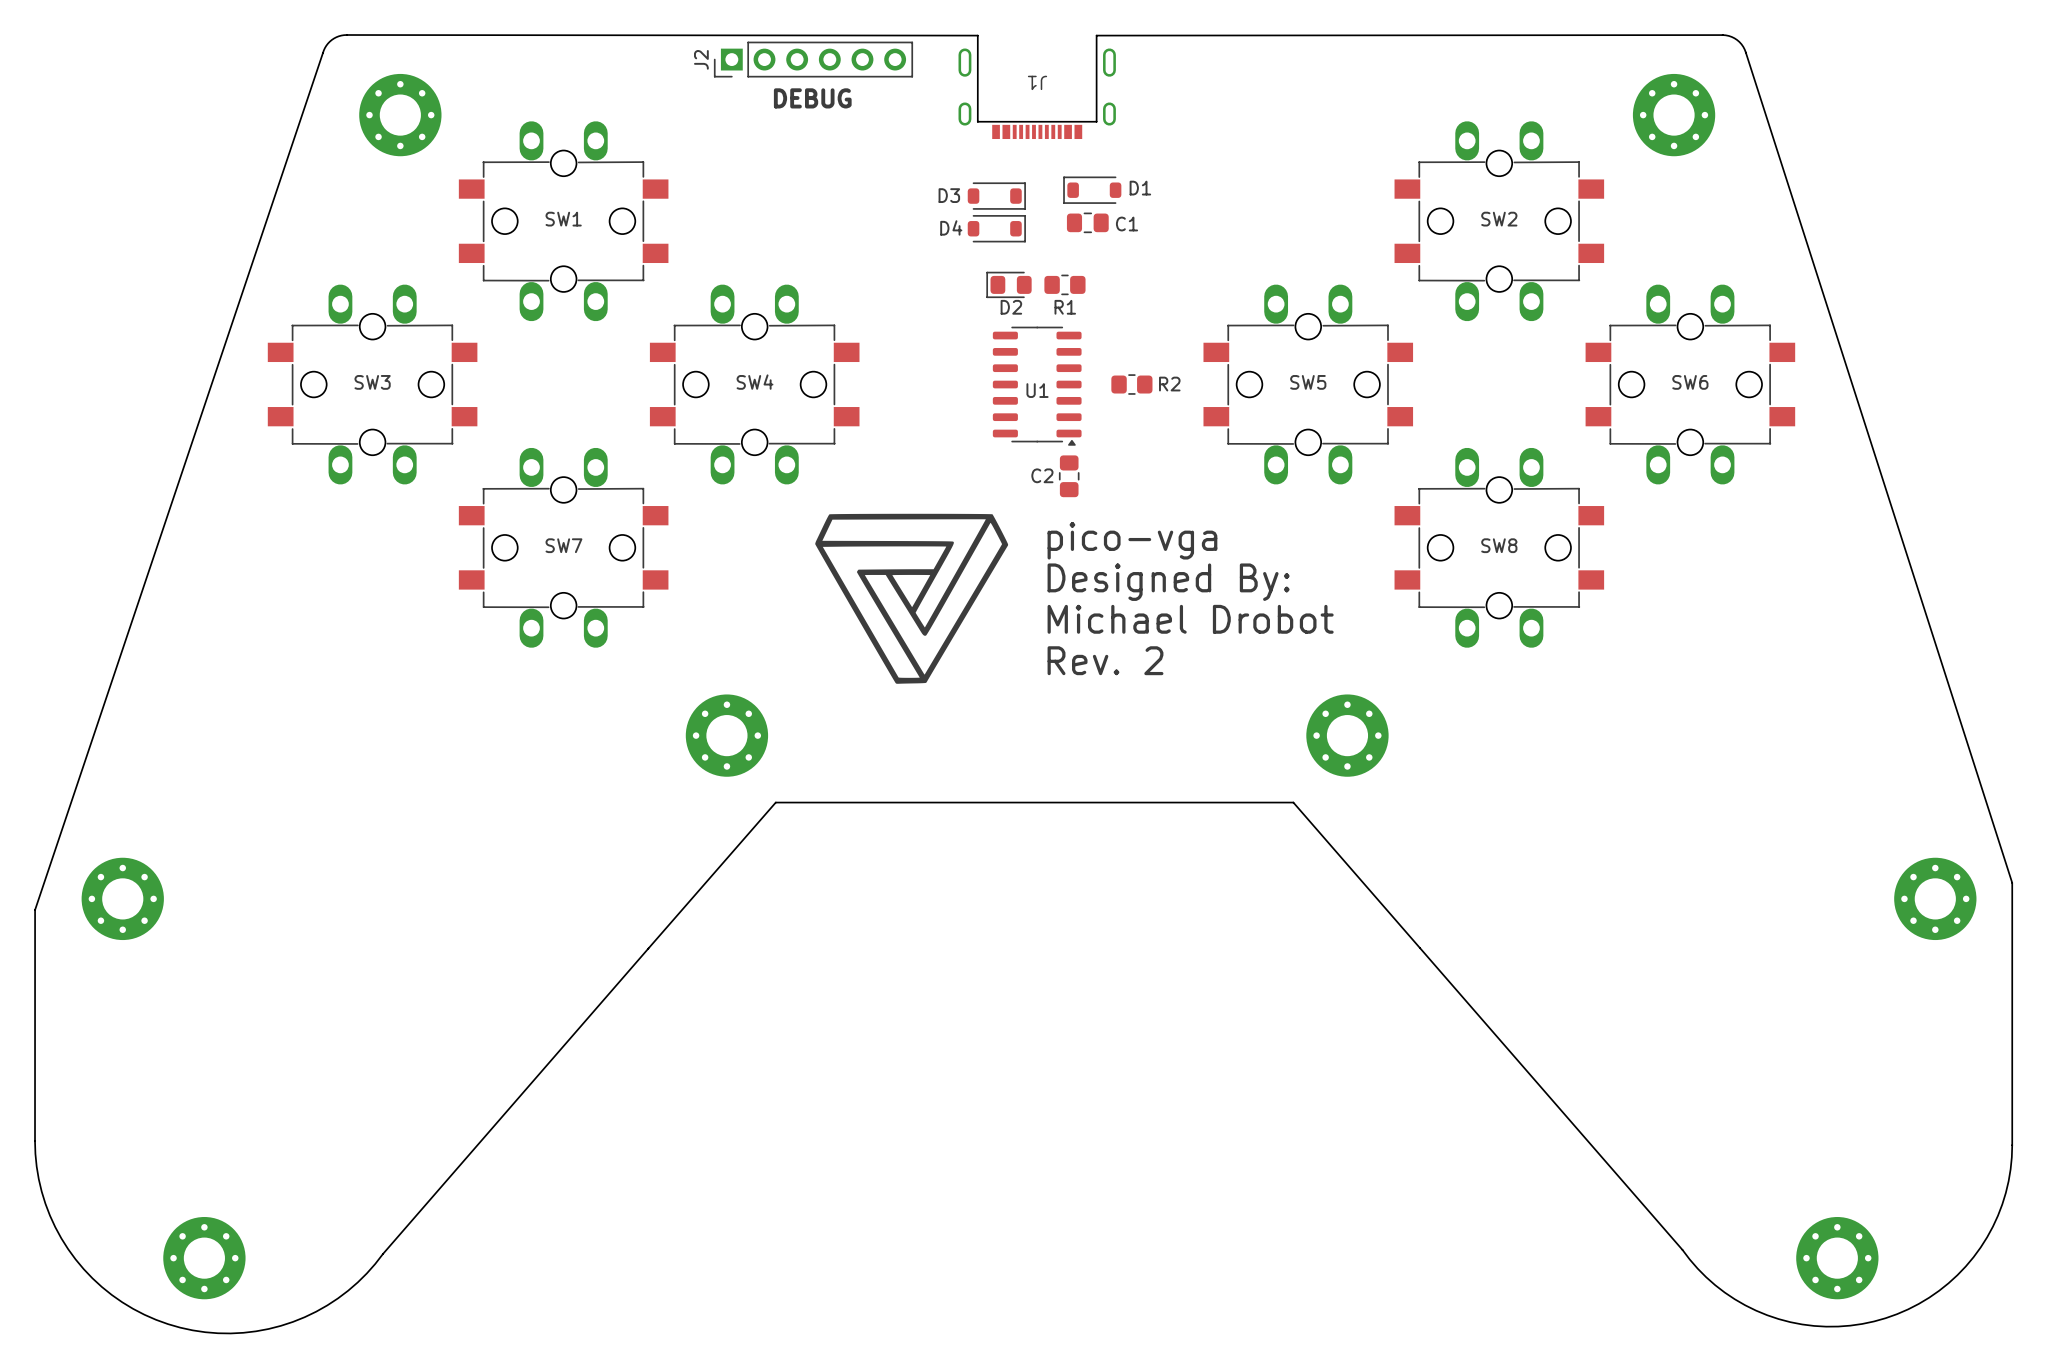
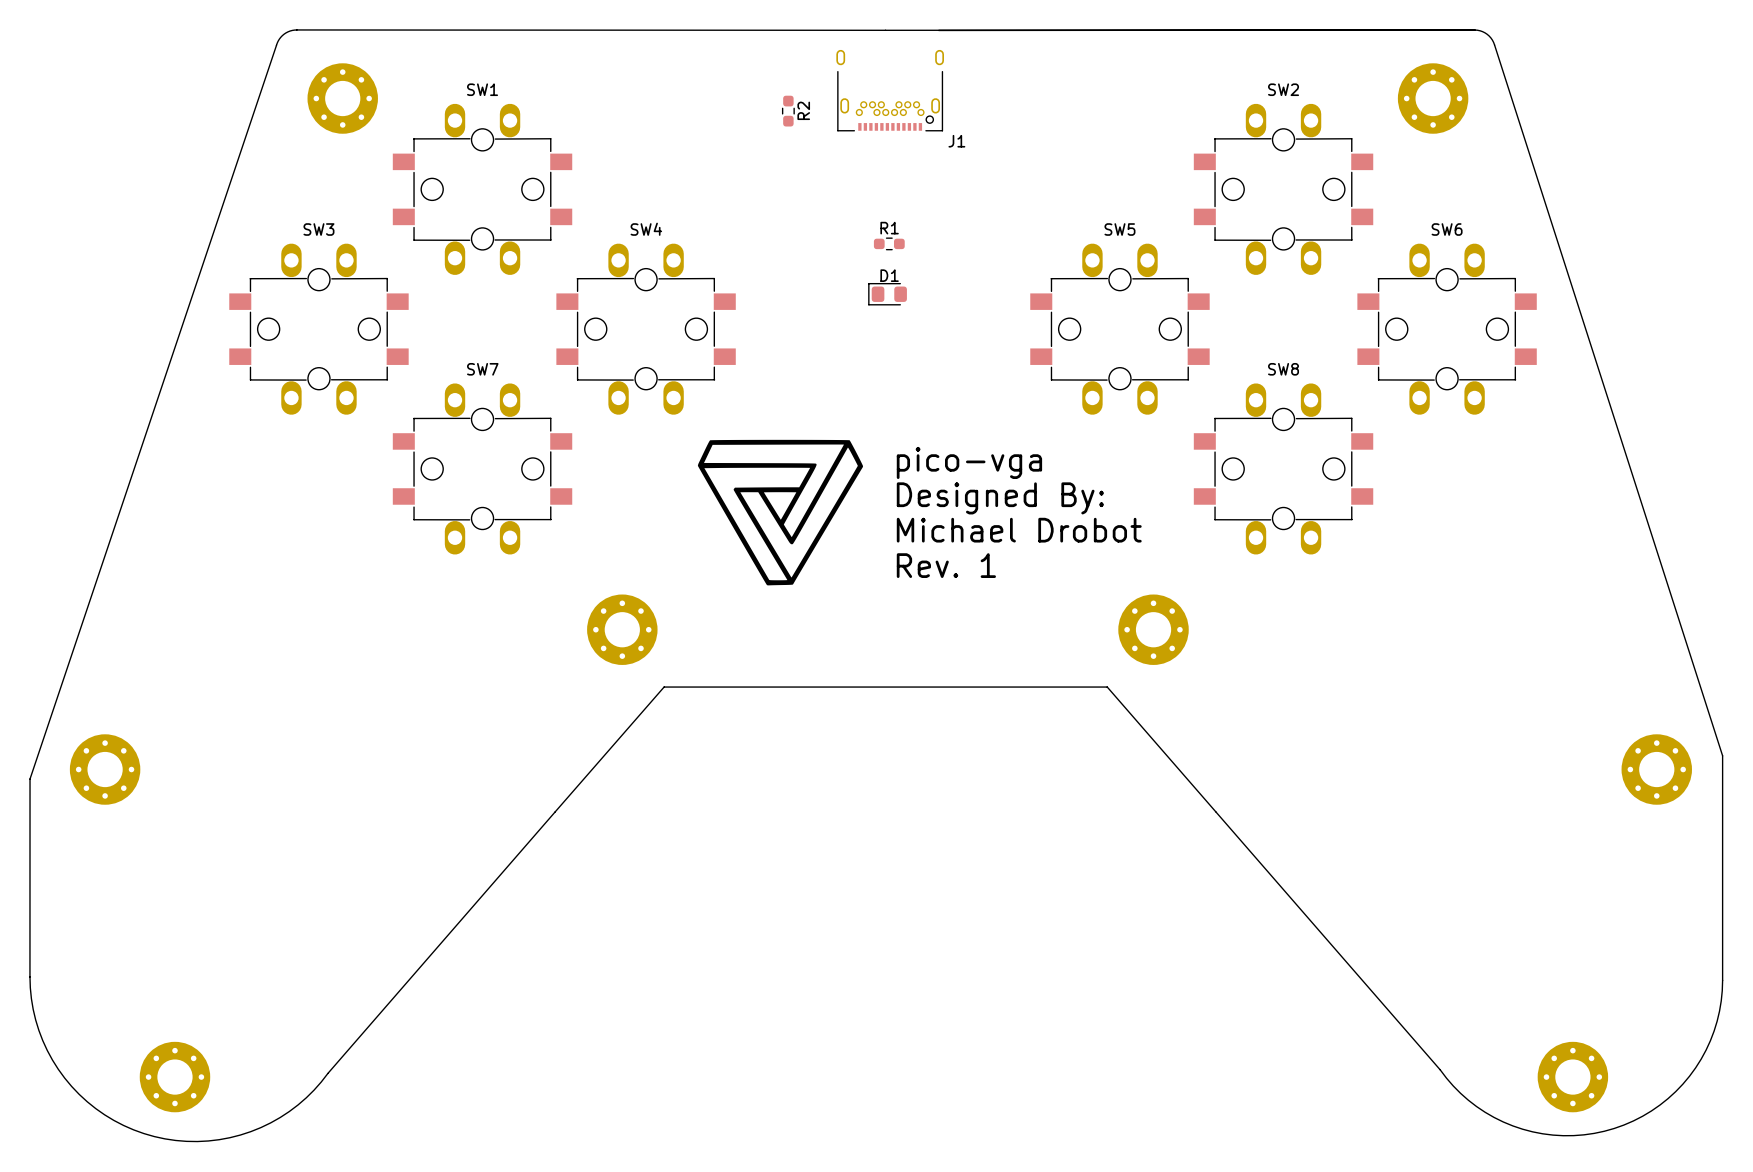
J1 footprint: [958, 34, 1116, 140] -> [836, 49, 944, 132]
board edge: (346, 35) (977, 35) -> (296, 29) (1474, 30)
J2: (813, 59) -> none
J1 name position: J1 (1037, 82) -> J1 (956, 141)
text: DEBUG (812, 98) -> none
D1 footprint: [1063, 176, 1122, 204] -> [868, 283, 907, 306]
D1 name position: D1 (1140, 188) -> D1 (889, 275)
D3: (996, 196) -> none
SW1 name position: SW1 (563, 219) -> SW1 (482, 89)
SW2 name position: SW2 (1499, 219) -> SW2 (1283, 89)
C1: (1087, 222) -> none
D4: (996, 228) -> none
R1 footprint: [1044, 274, 1086, 296] -> [873, 237, 905, 251]
D2: (1009, 284) -> none
R1 name position: R1 (1065, 307) -> R1 (889, 228)
R2 footprint: [1111, 374, 1153, 395] -> [781, 95, 795, 127]
SW3 name position: SW3 (372, 382) -> SW3 (318, 229)
SW4 name position: SW4 (755, 382) -> SW4 (646, 229)
SW5 name position: SW5 (1308, 382) -> SW5 (1119, 229)
SW6 name position: SW6 (1690, 382) -> SW6 (1447, 229)
U1: (1037, 386) -> none
C2: (1069, 476) -> none
SW7 name position: SW7 (563, 545) -> SW7 (482, 369)
SW8 name position: SW8 (1499, 545) -> SW8 (1283, 369)
text: Rev. 2 (1105, 660) -> Rev. 1 (946, 565)

